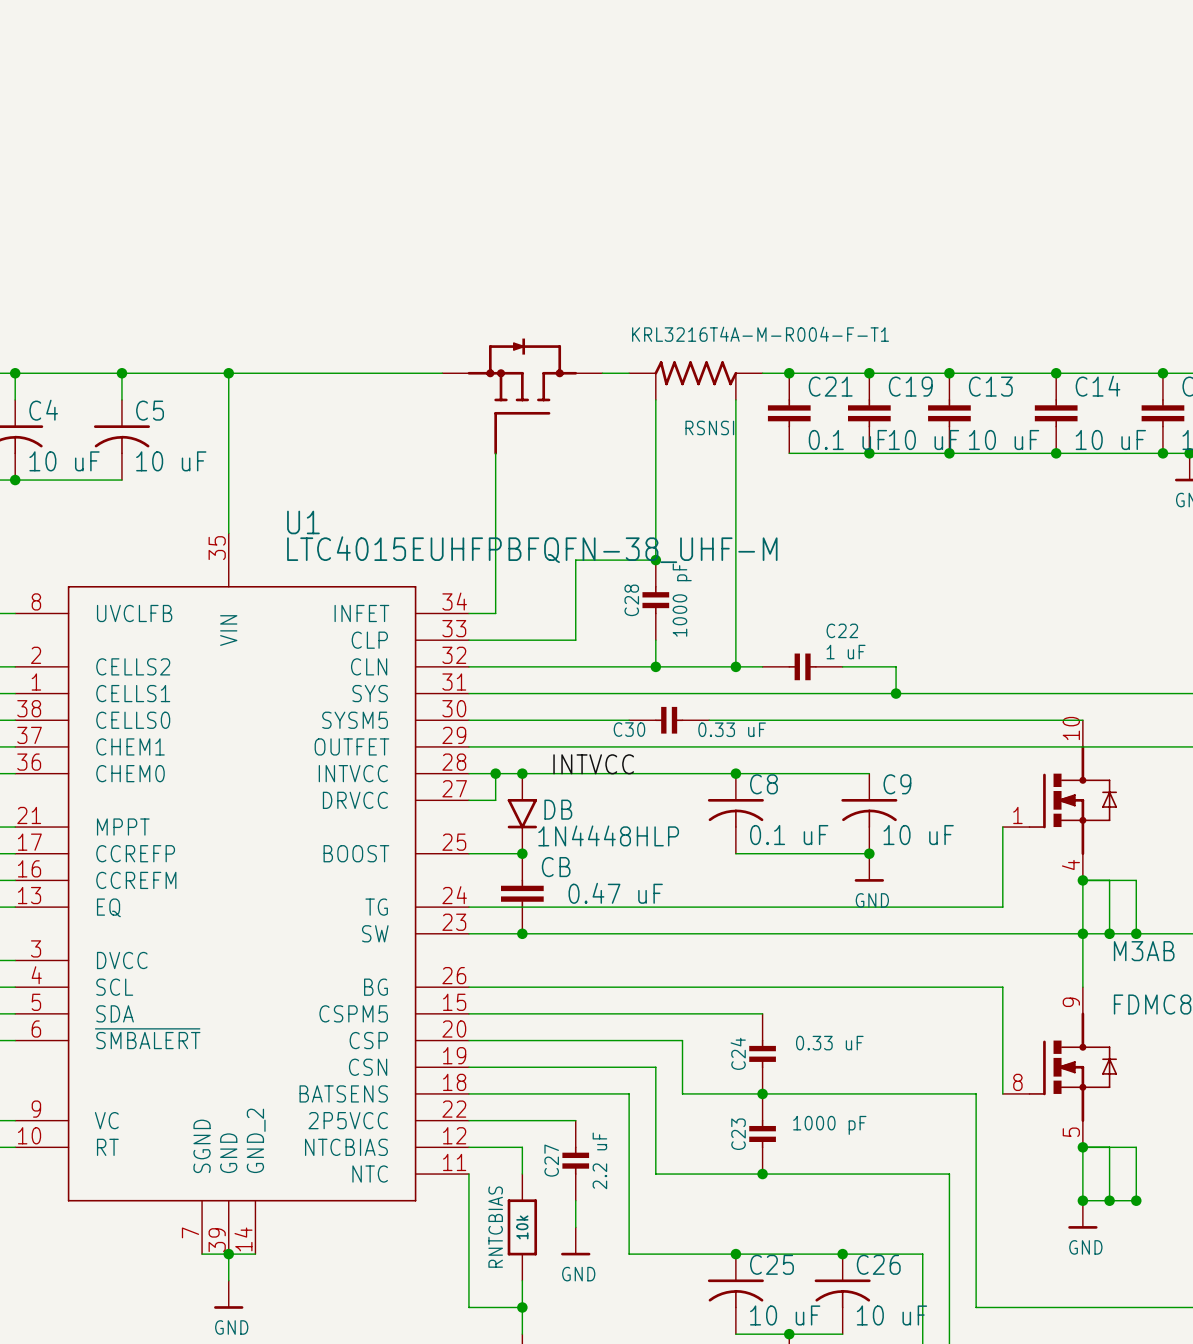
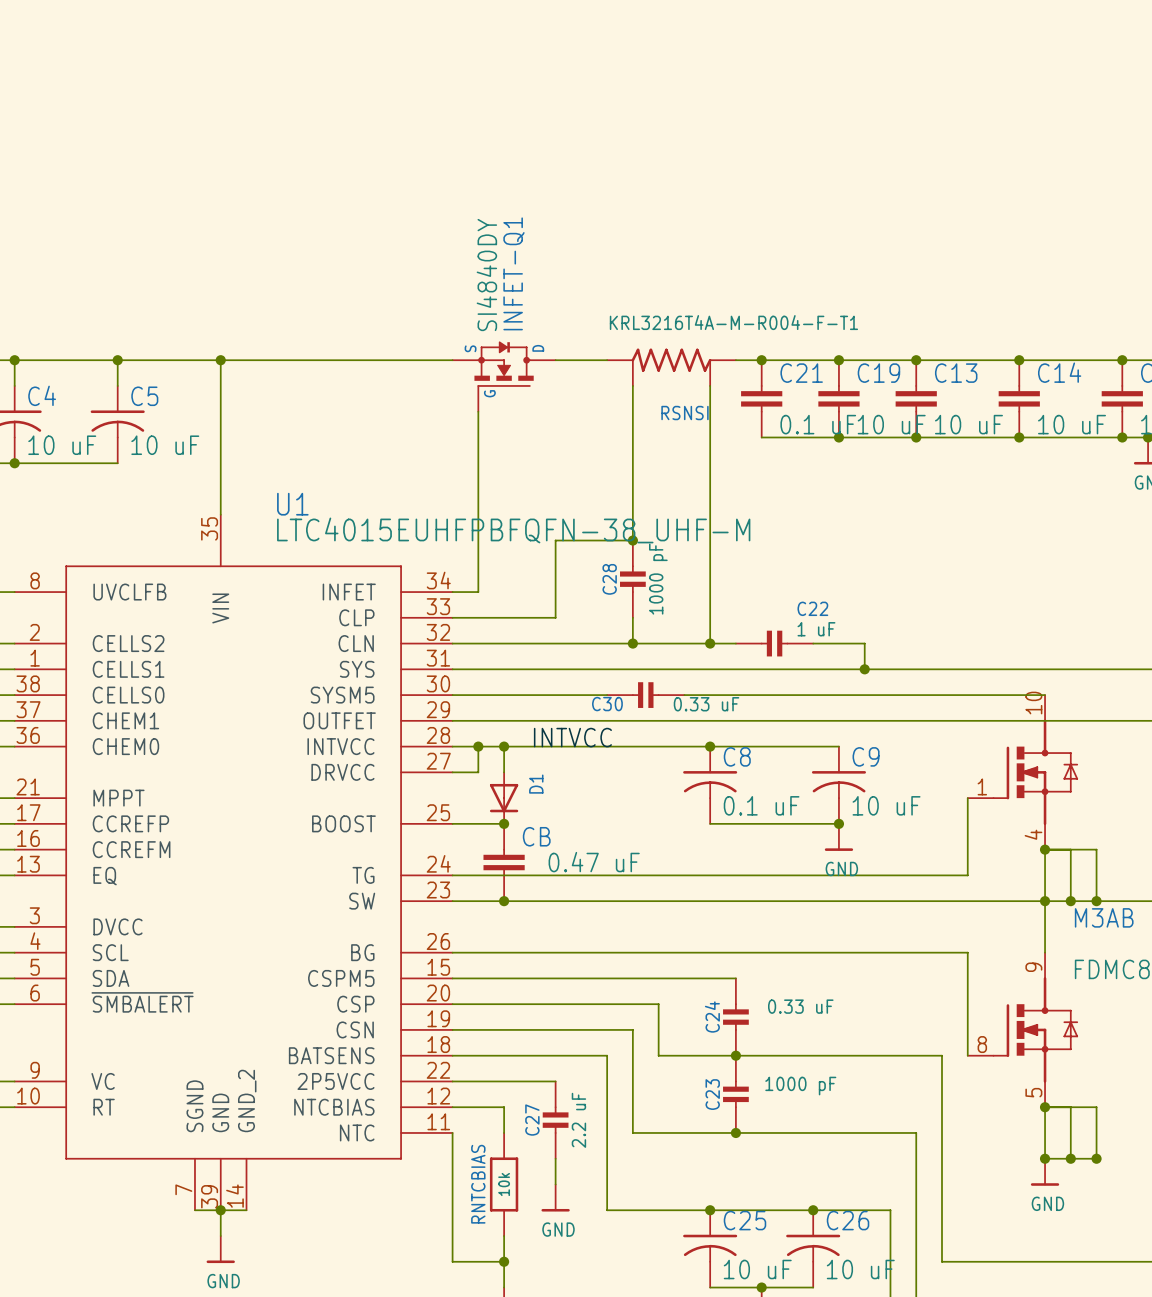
INFET-Q1: none -> SI4840DY (504, 376)
part: (522, 396) -> none
DB: 1N4448HLP (522, 813) -> none
D1: none -> (504, 798)

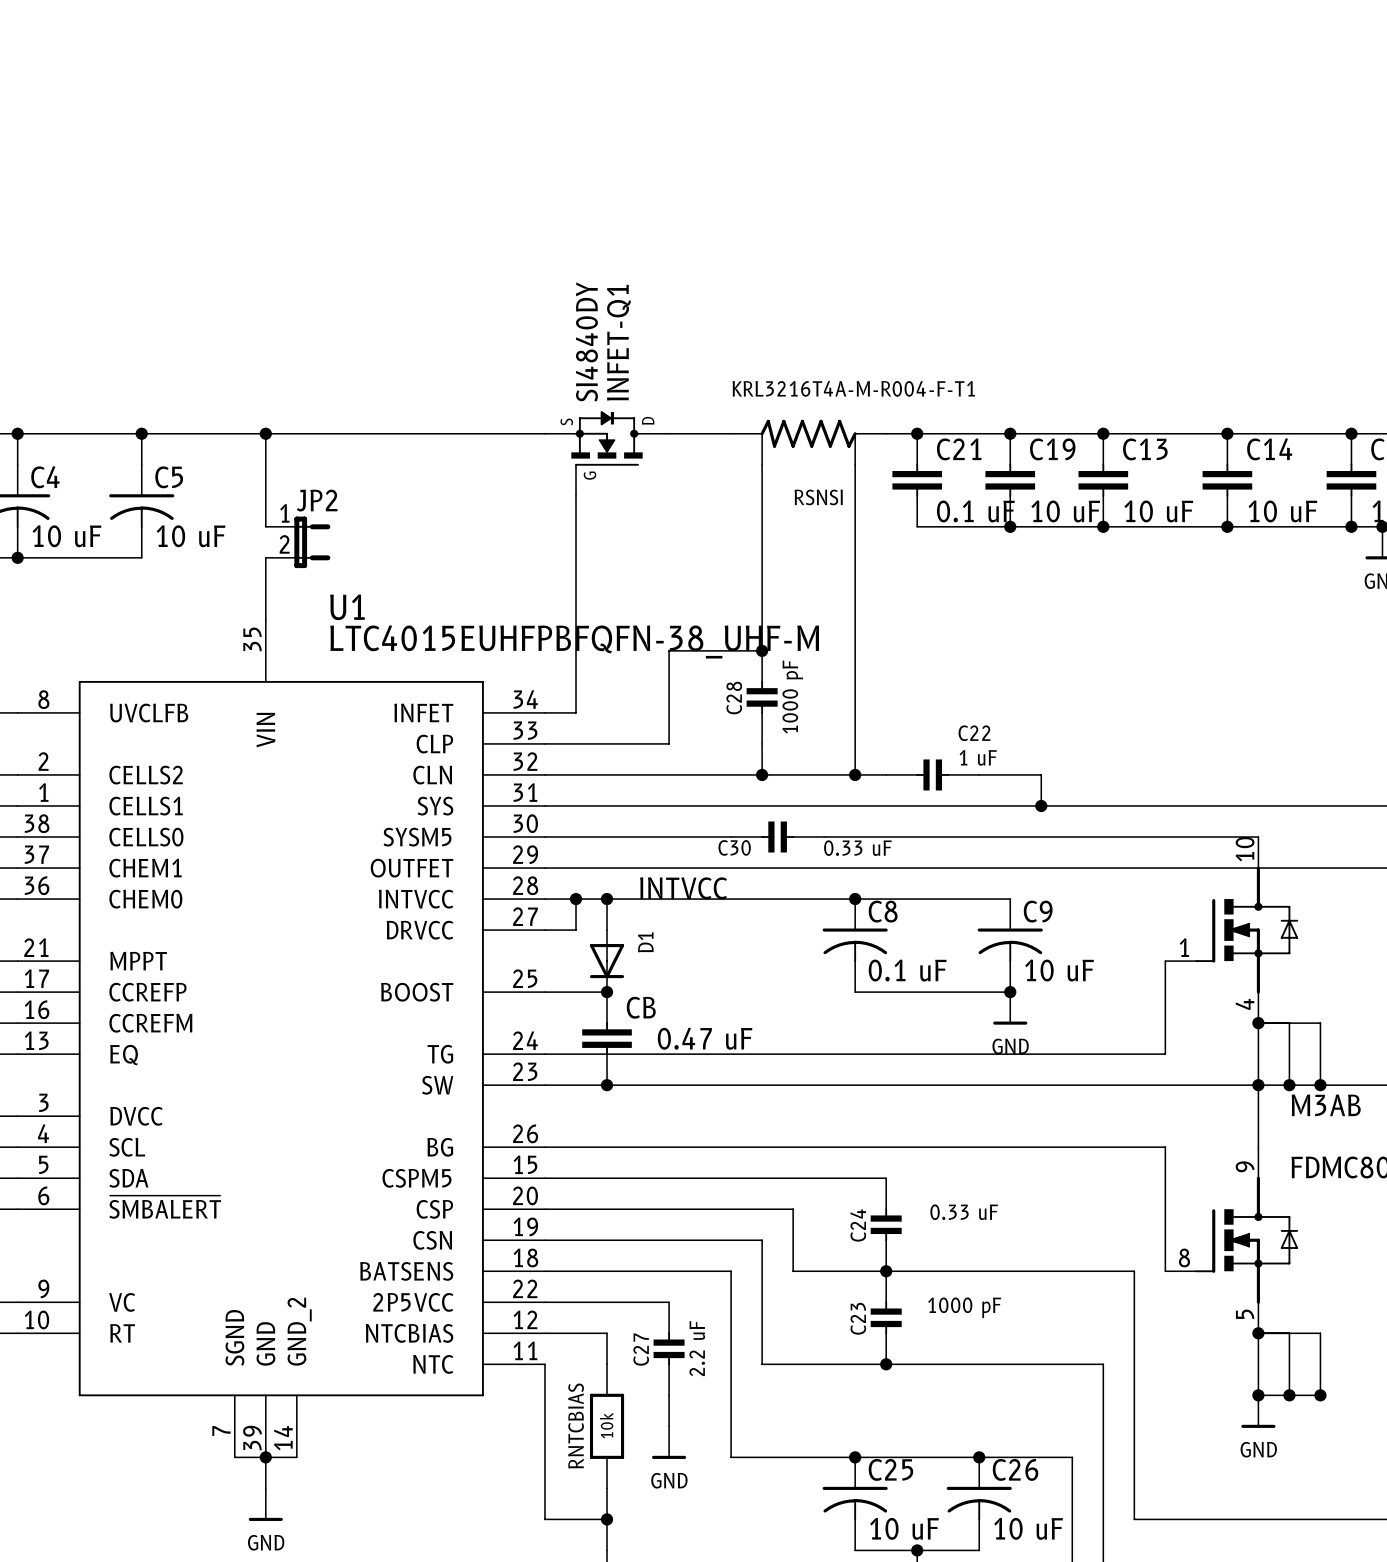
wire: (220, 437) (220, 463) -> none
JP2: none -> (298, 542)

